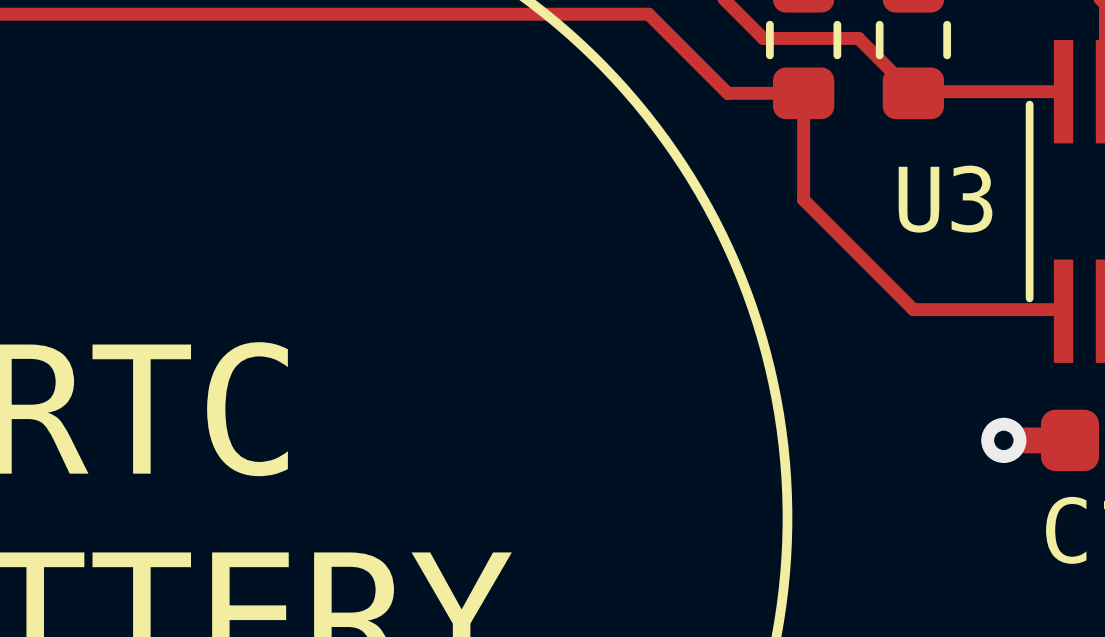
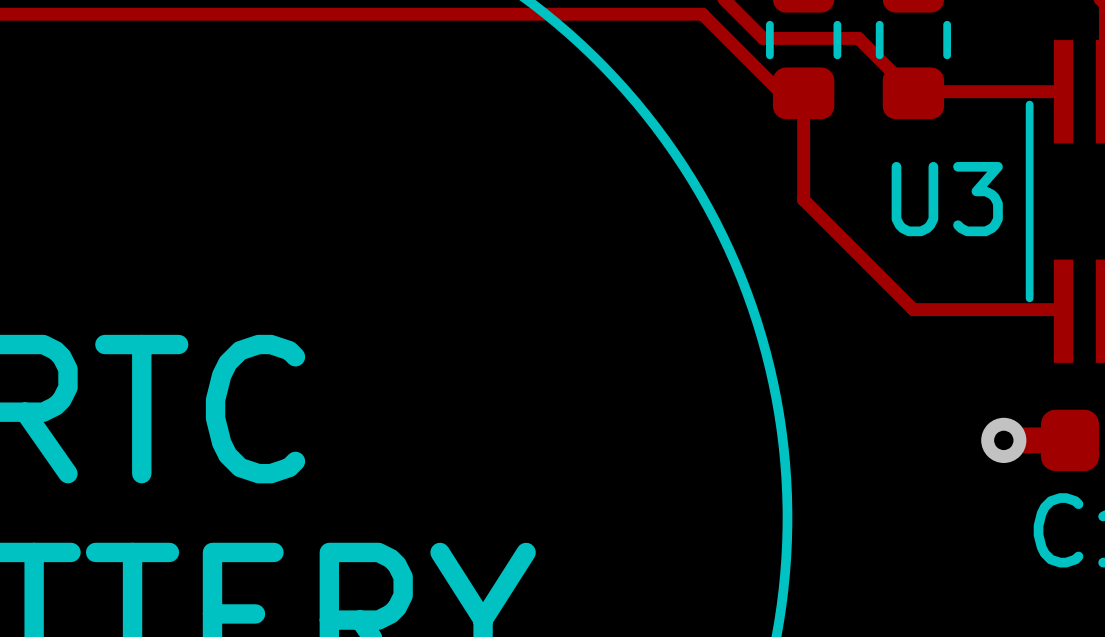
track: (648, 14) (727, 93) (781, 93) -> (648, 14) (702, 14) (781, 93)

